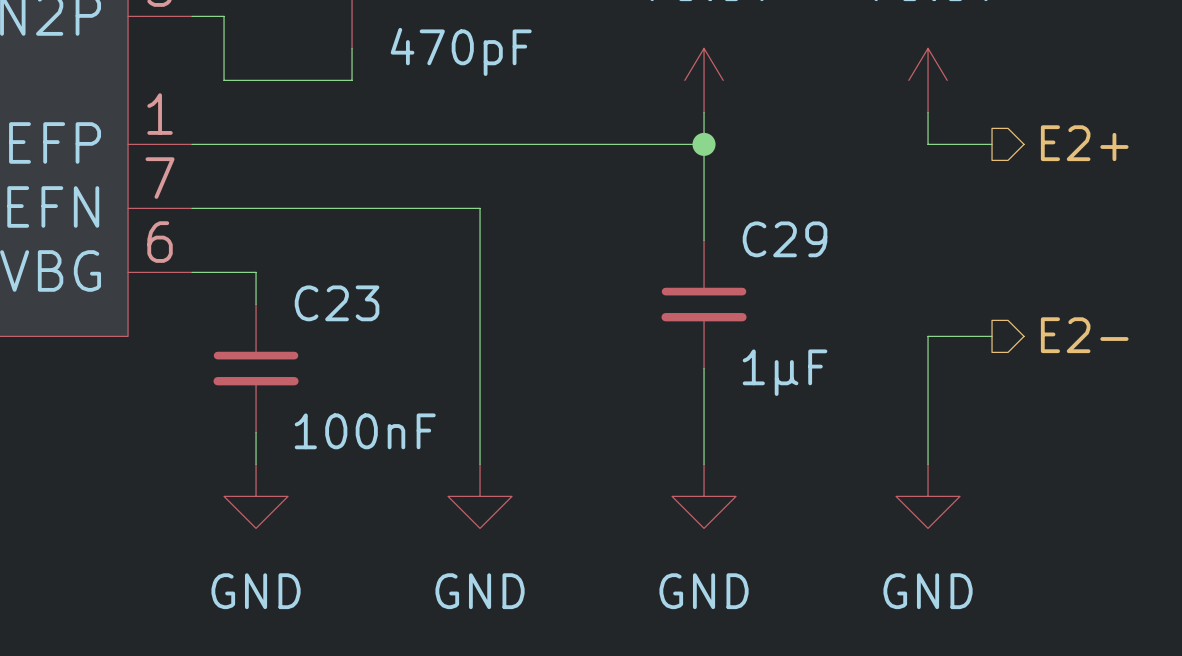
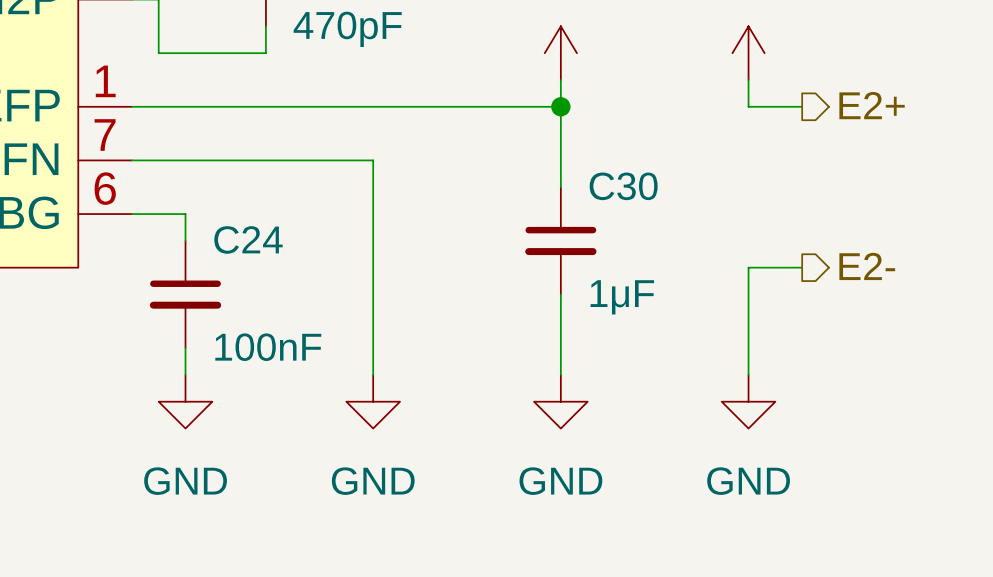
C29 name: C29 (785, 239) -> C30 (623, 186)
C23 name: C23 (337, 303) -> C24 (248, 239)

